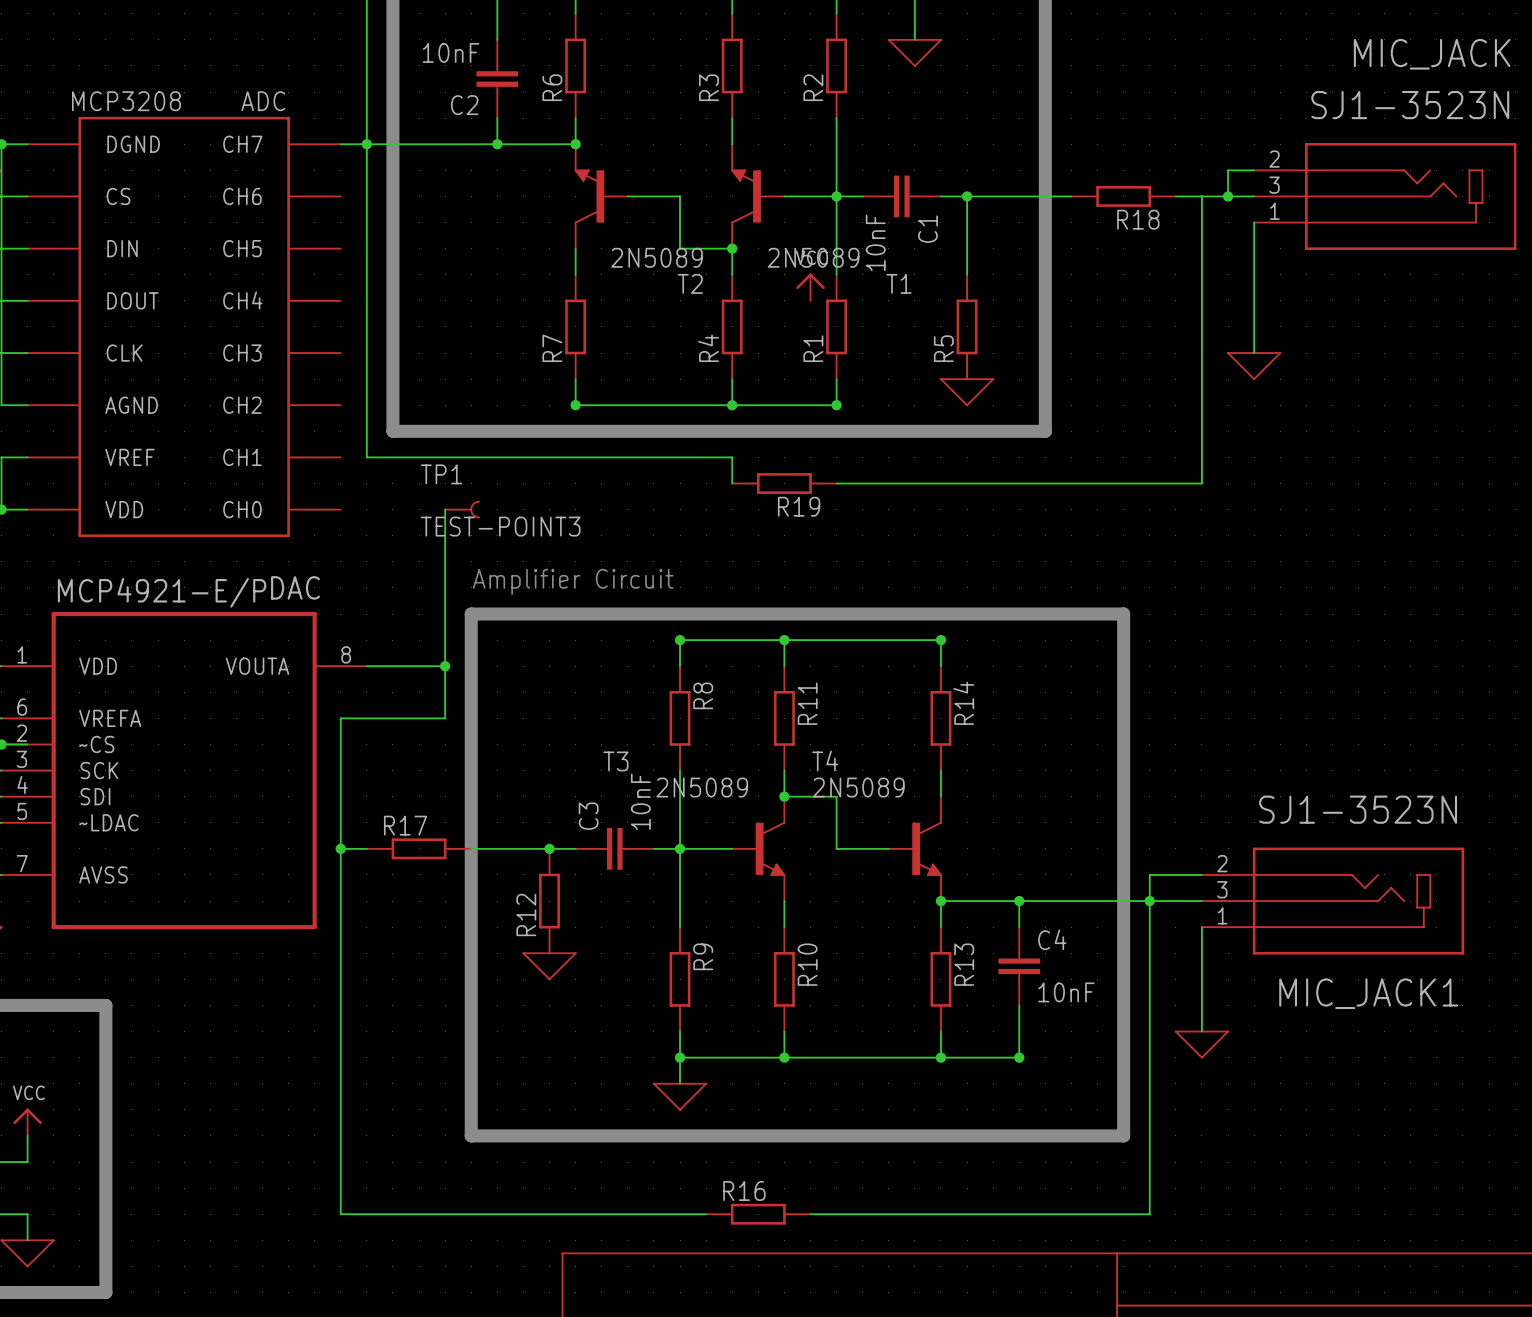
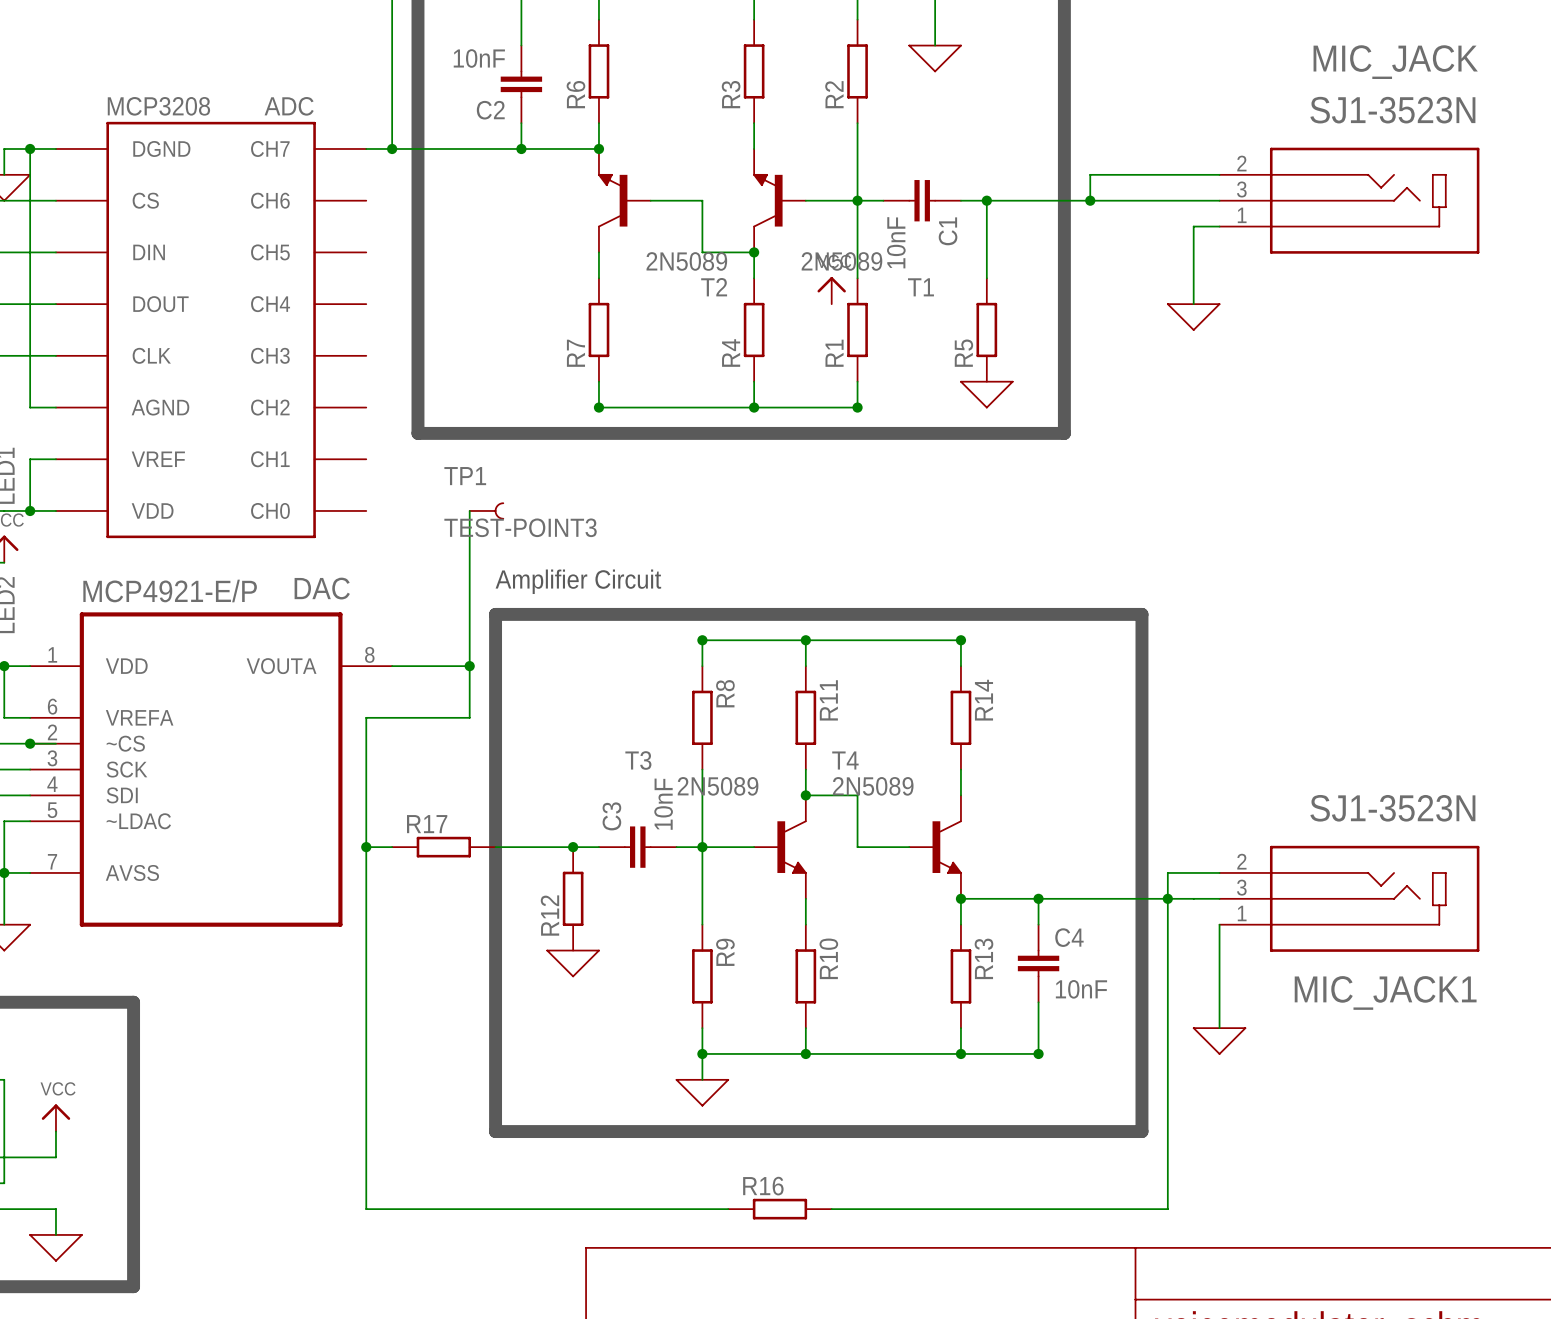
wire: (366, 144) (366, 457) (732, 457) (732, 483) -> none
wire: none -> (1219, 174) (1090, 174) (1090, 200) (1193, 200)
junction: none -> (1090, 200)
R18: (1123, 196) -> none
junction: (1228, 196) -> none
wire: (1254, 196) (1201, 196) (1201, 483) (836, 483) -> none
MIC_JACK position: (1385, 196) -> (1349, 200)
wire: none -> (1219, 226) (1193, 226) (1193, 304)
wire: (1254, 222) (1254, 353) -> none
power symbol position: (1254, 366) -> (1193, 317)
R19: (784, 483) -> none

